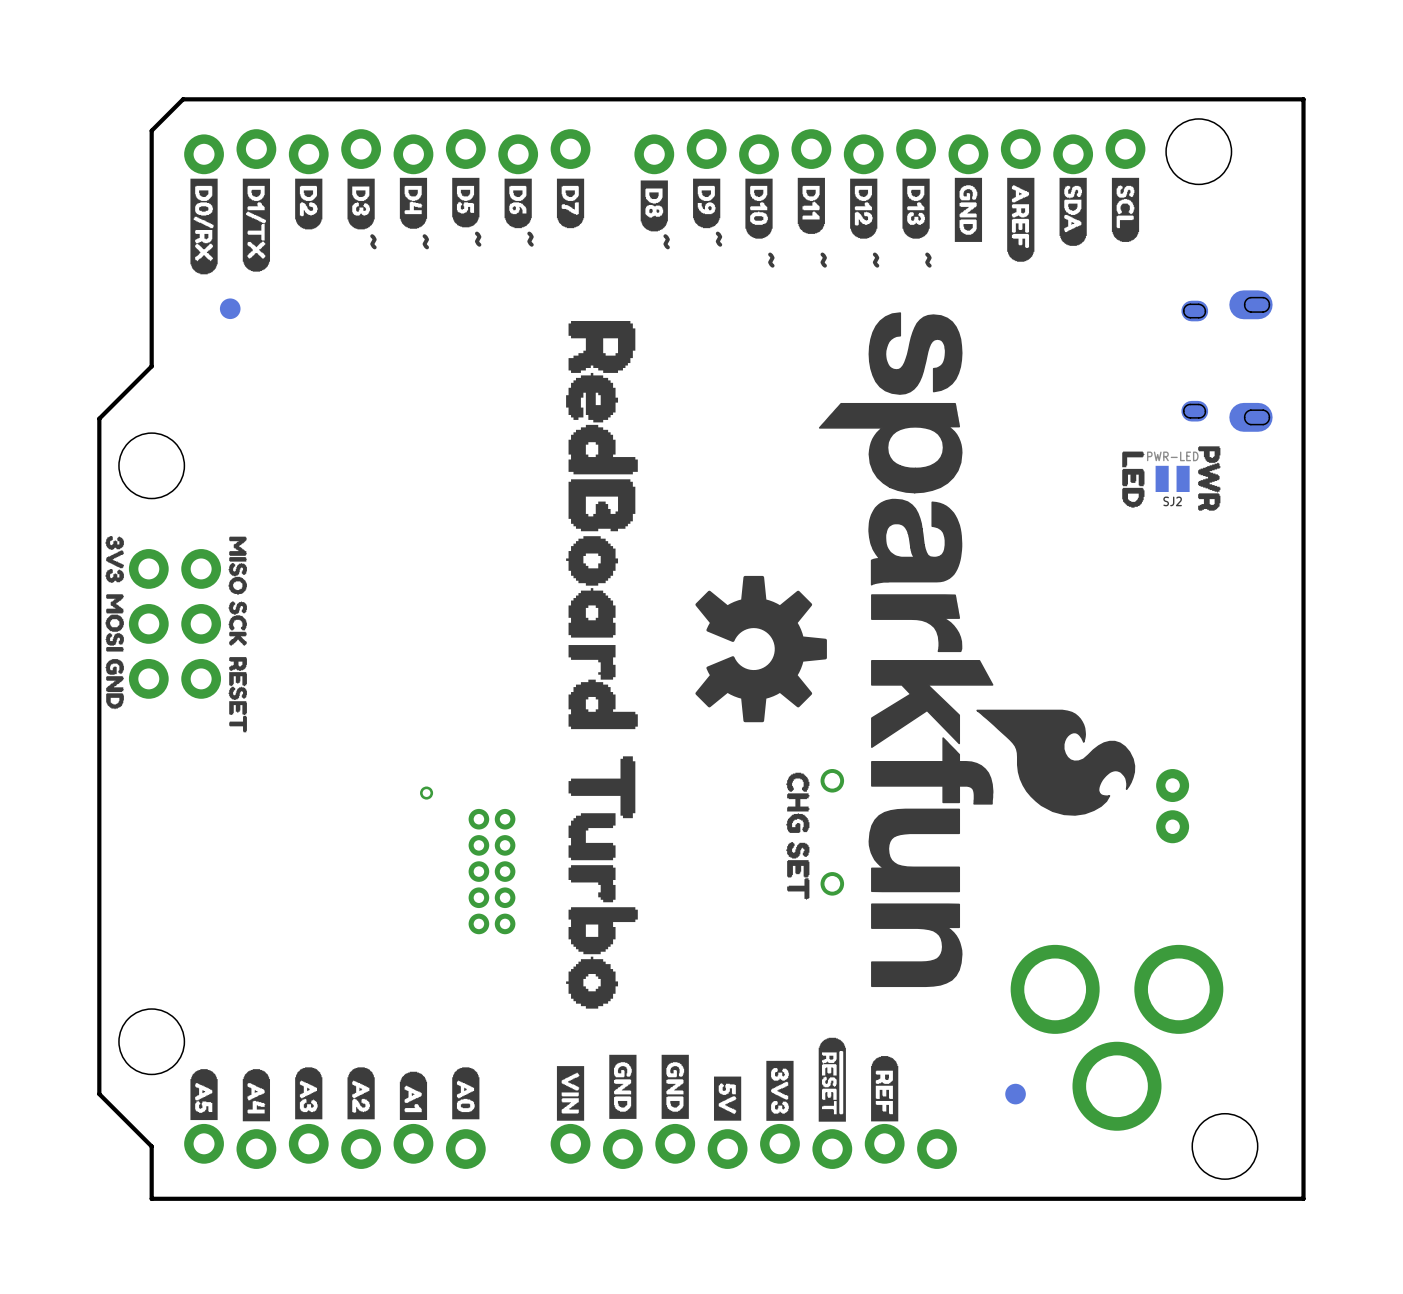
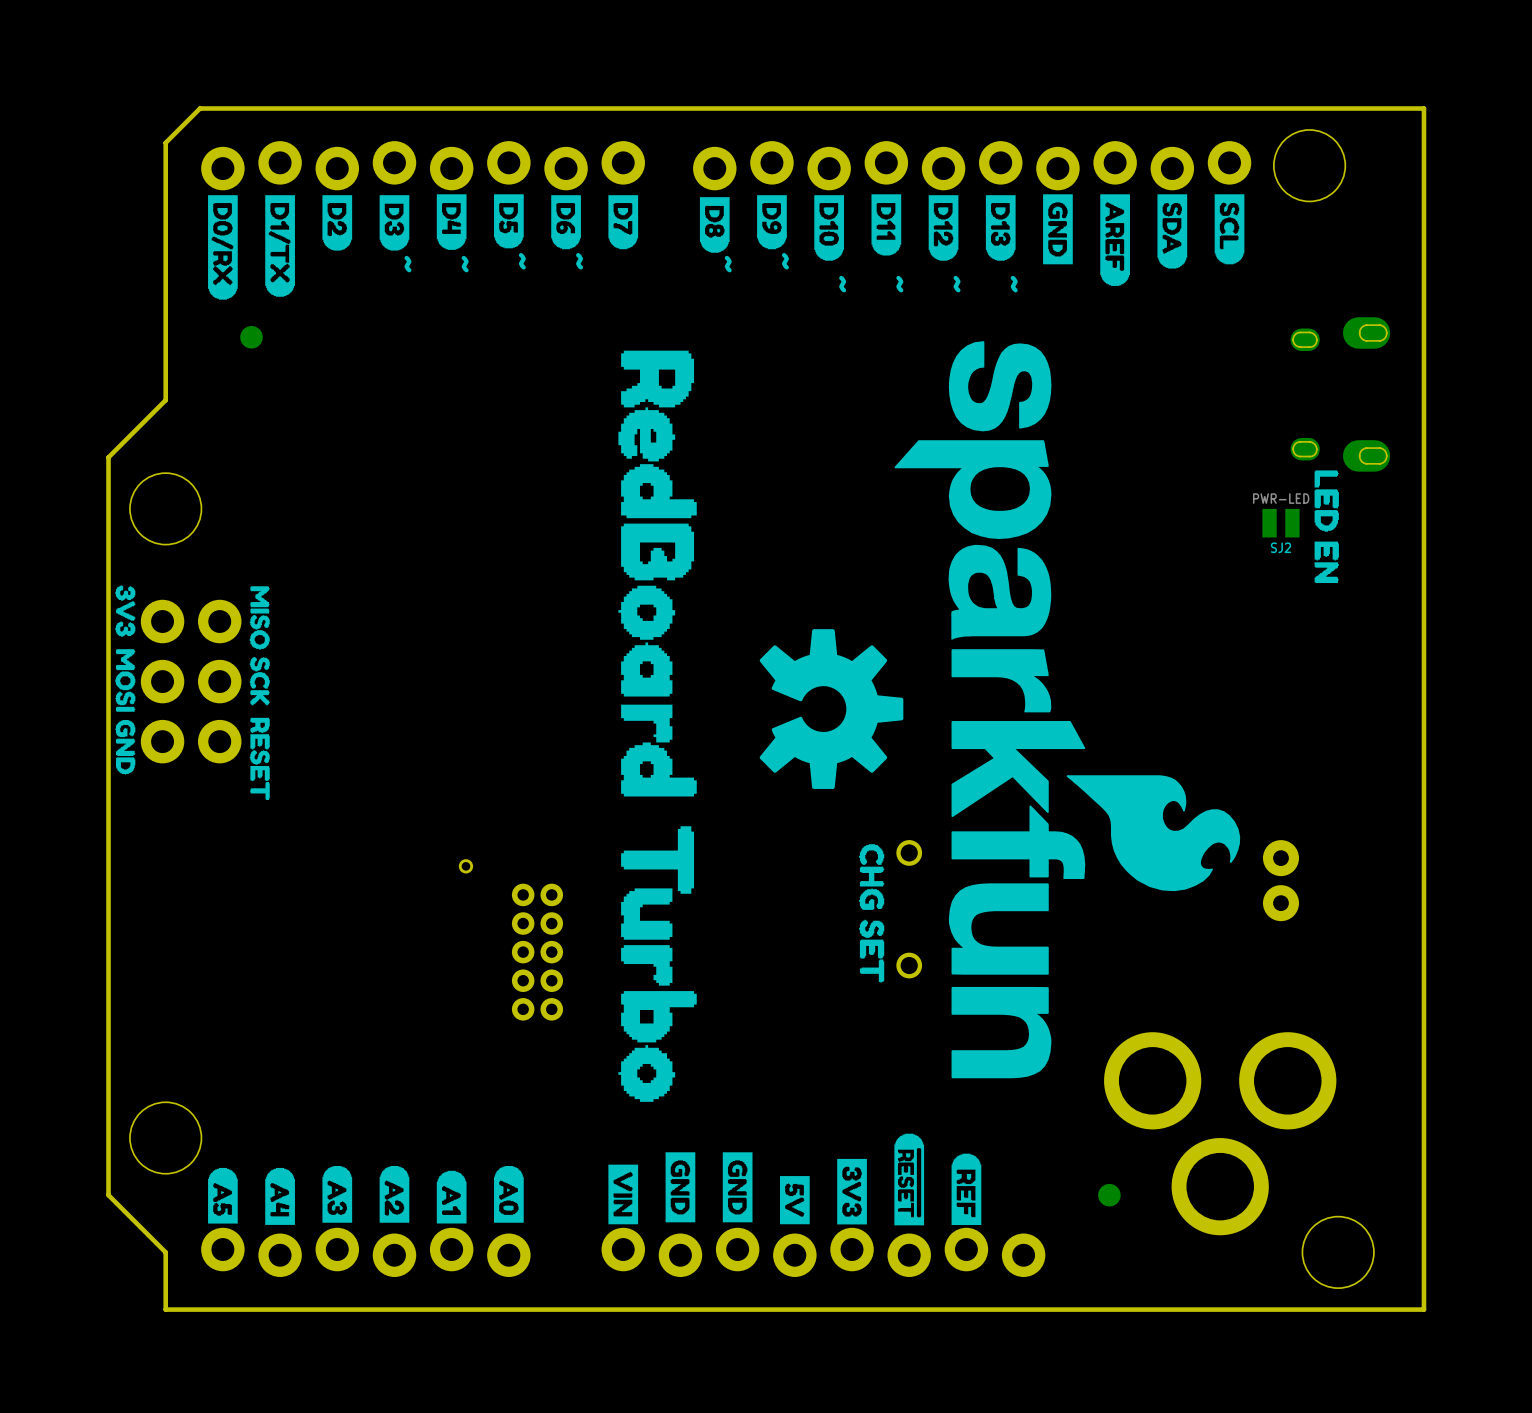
drawing shape: [1198, 446, 1221, 511] -> [1314, 470, 1339, 584]
drawing: [1122, 451, 1145, 508] -> none

